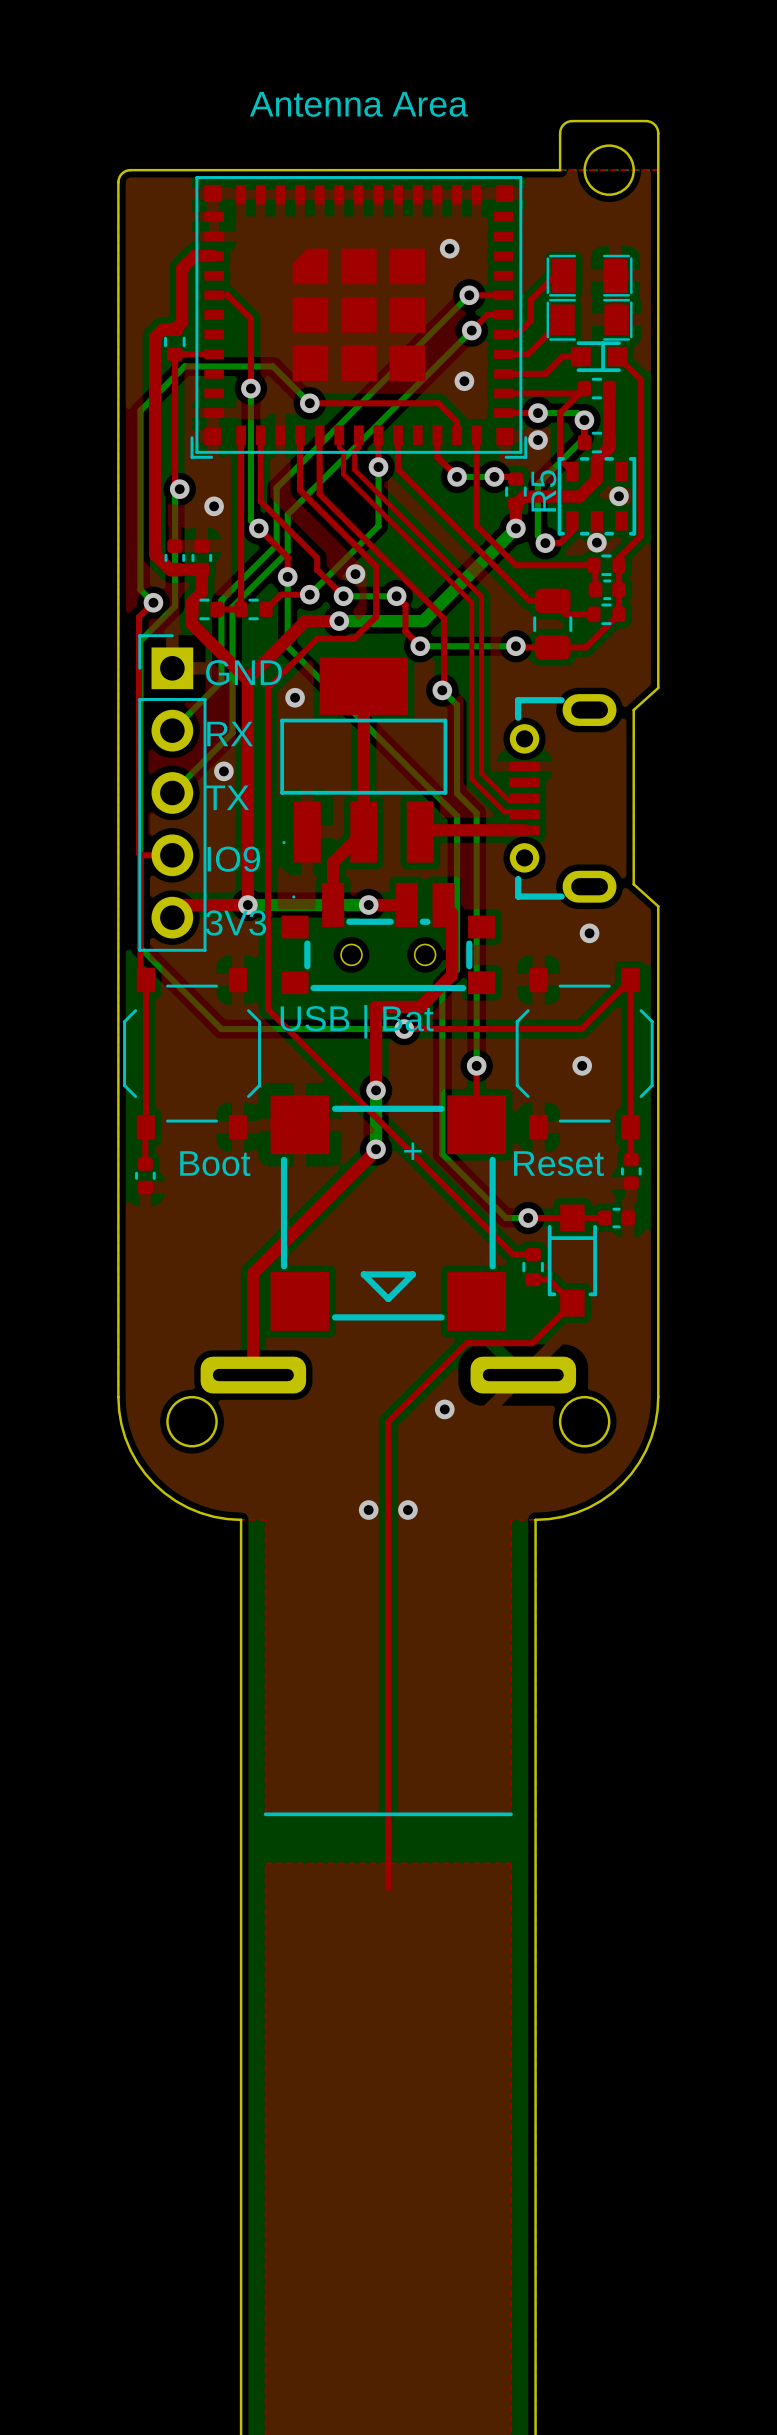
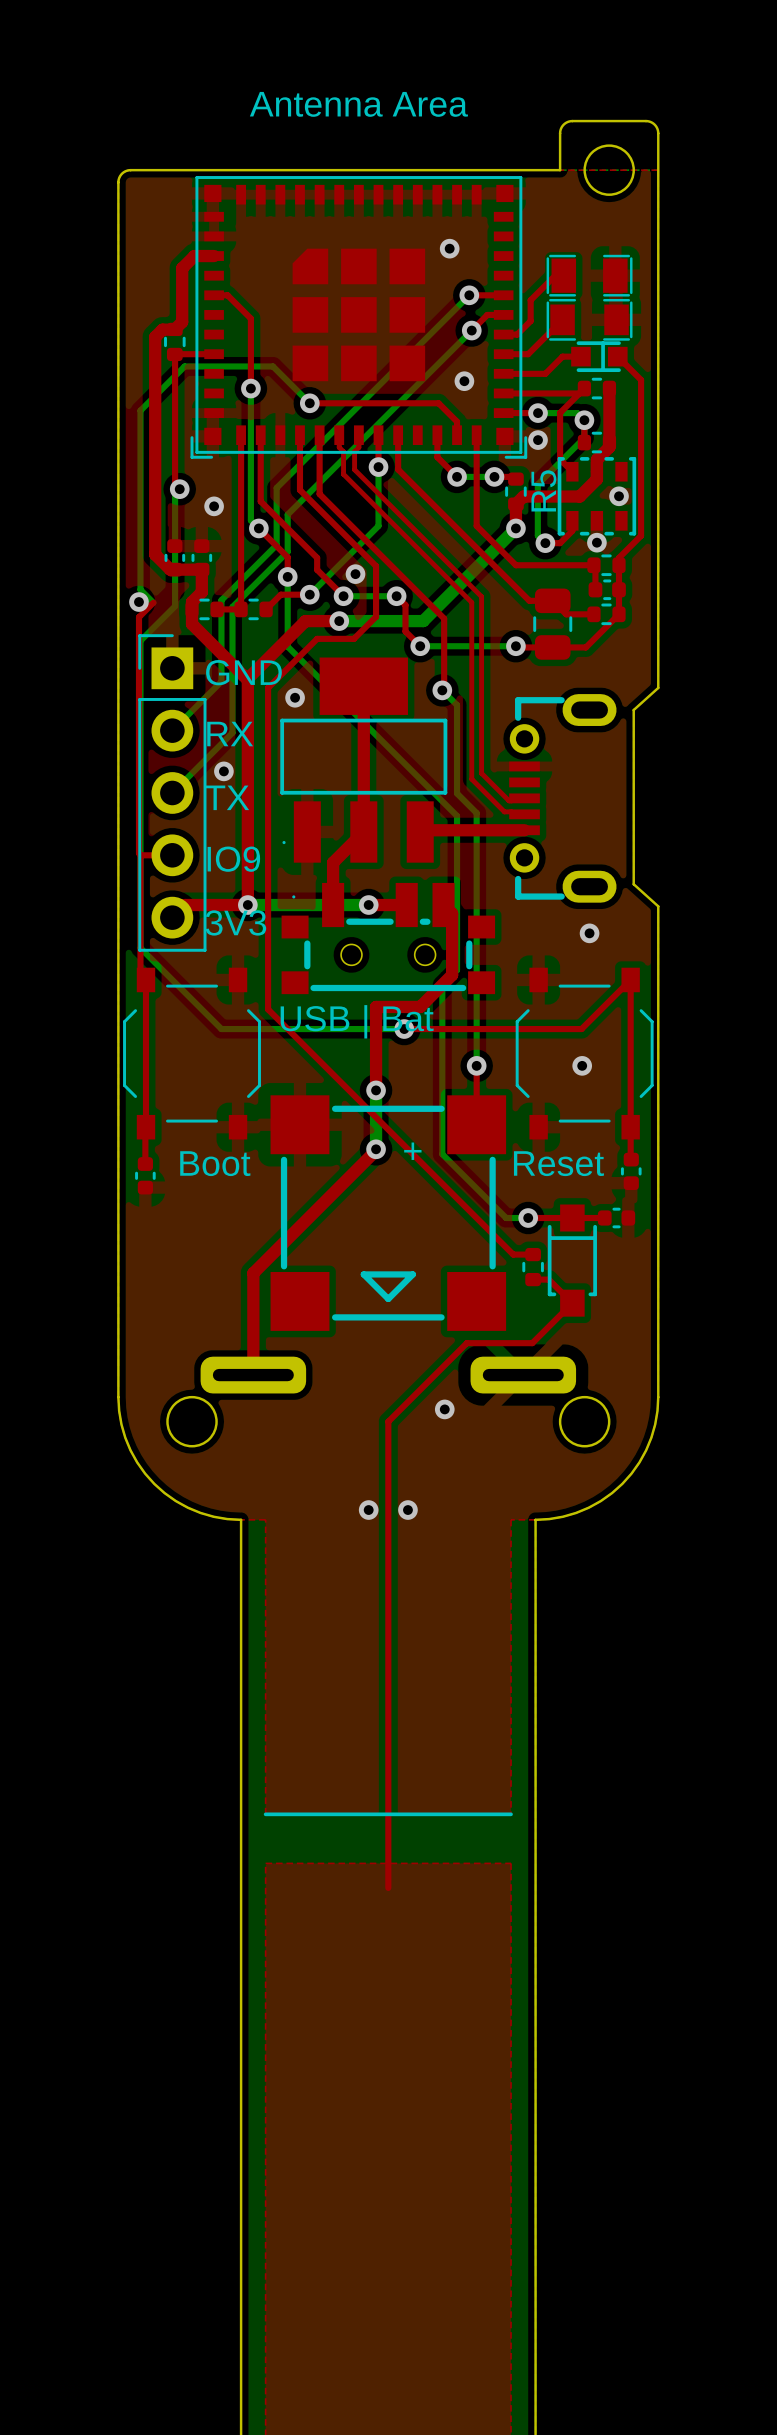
via position: (153, 602) -> (138, 602)

